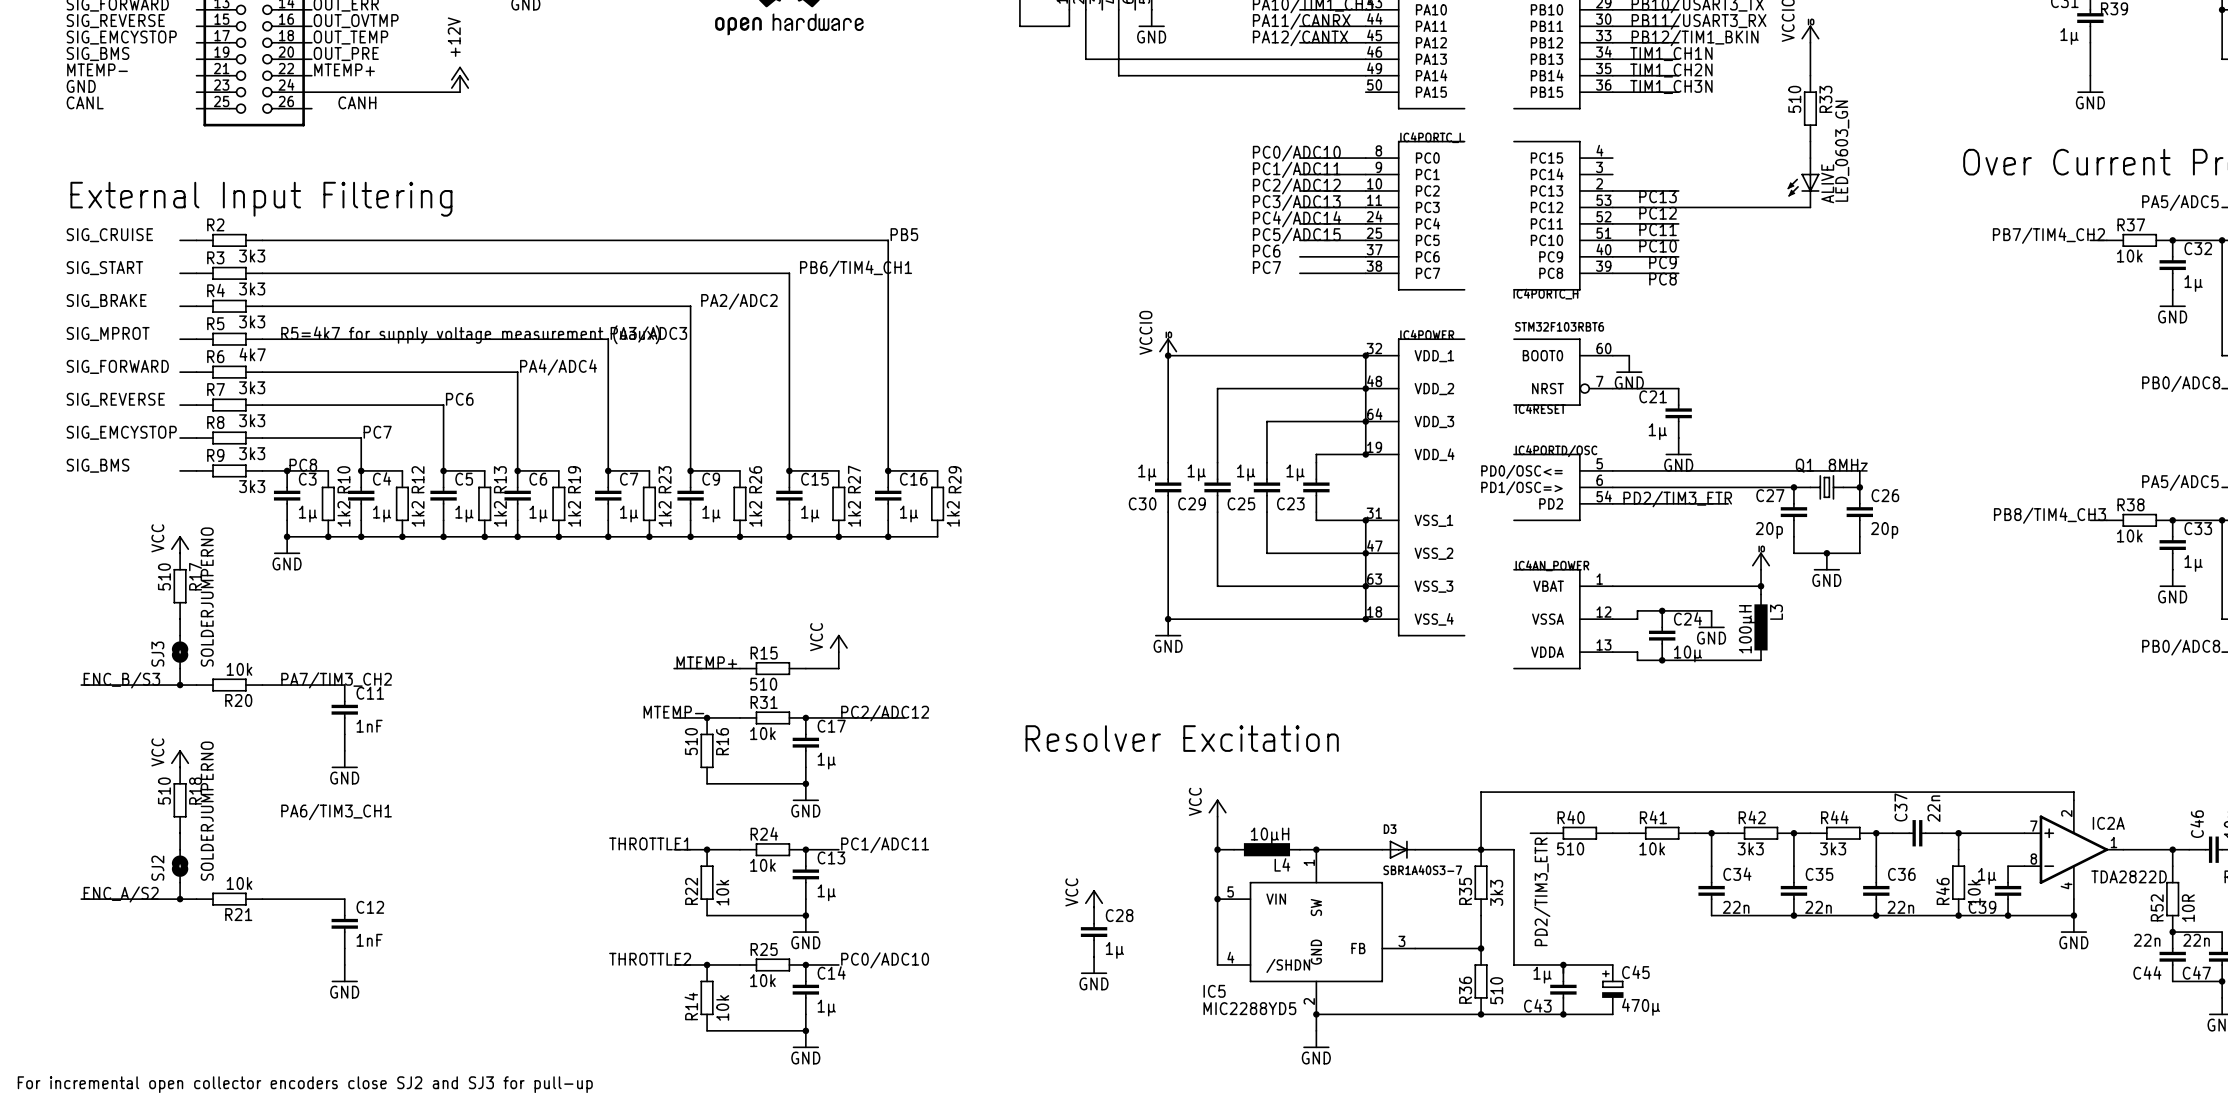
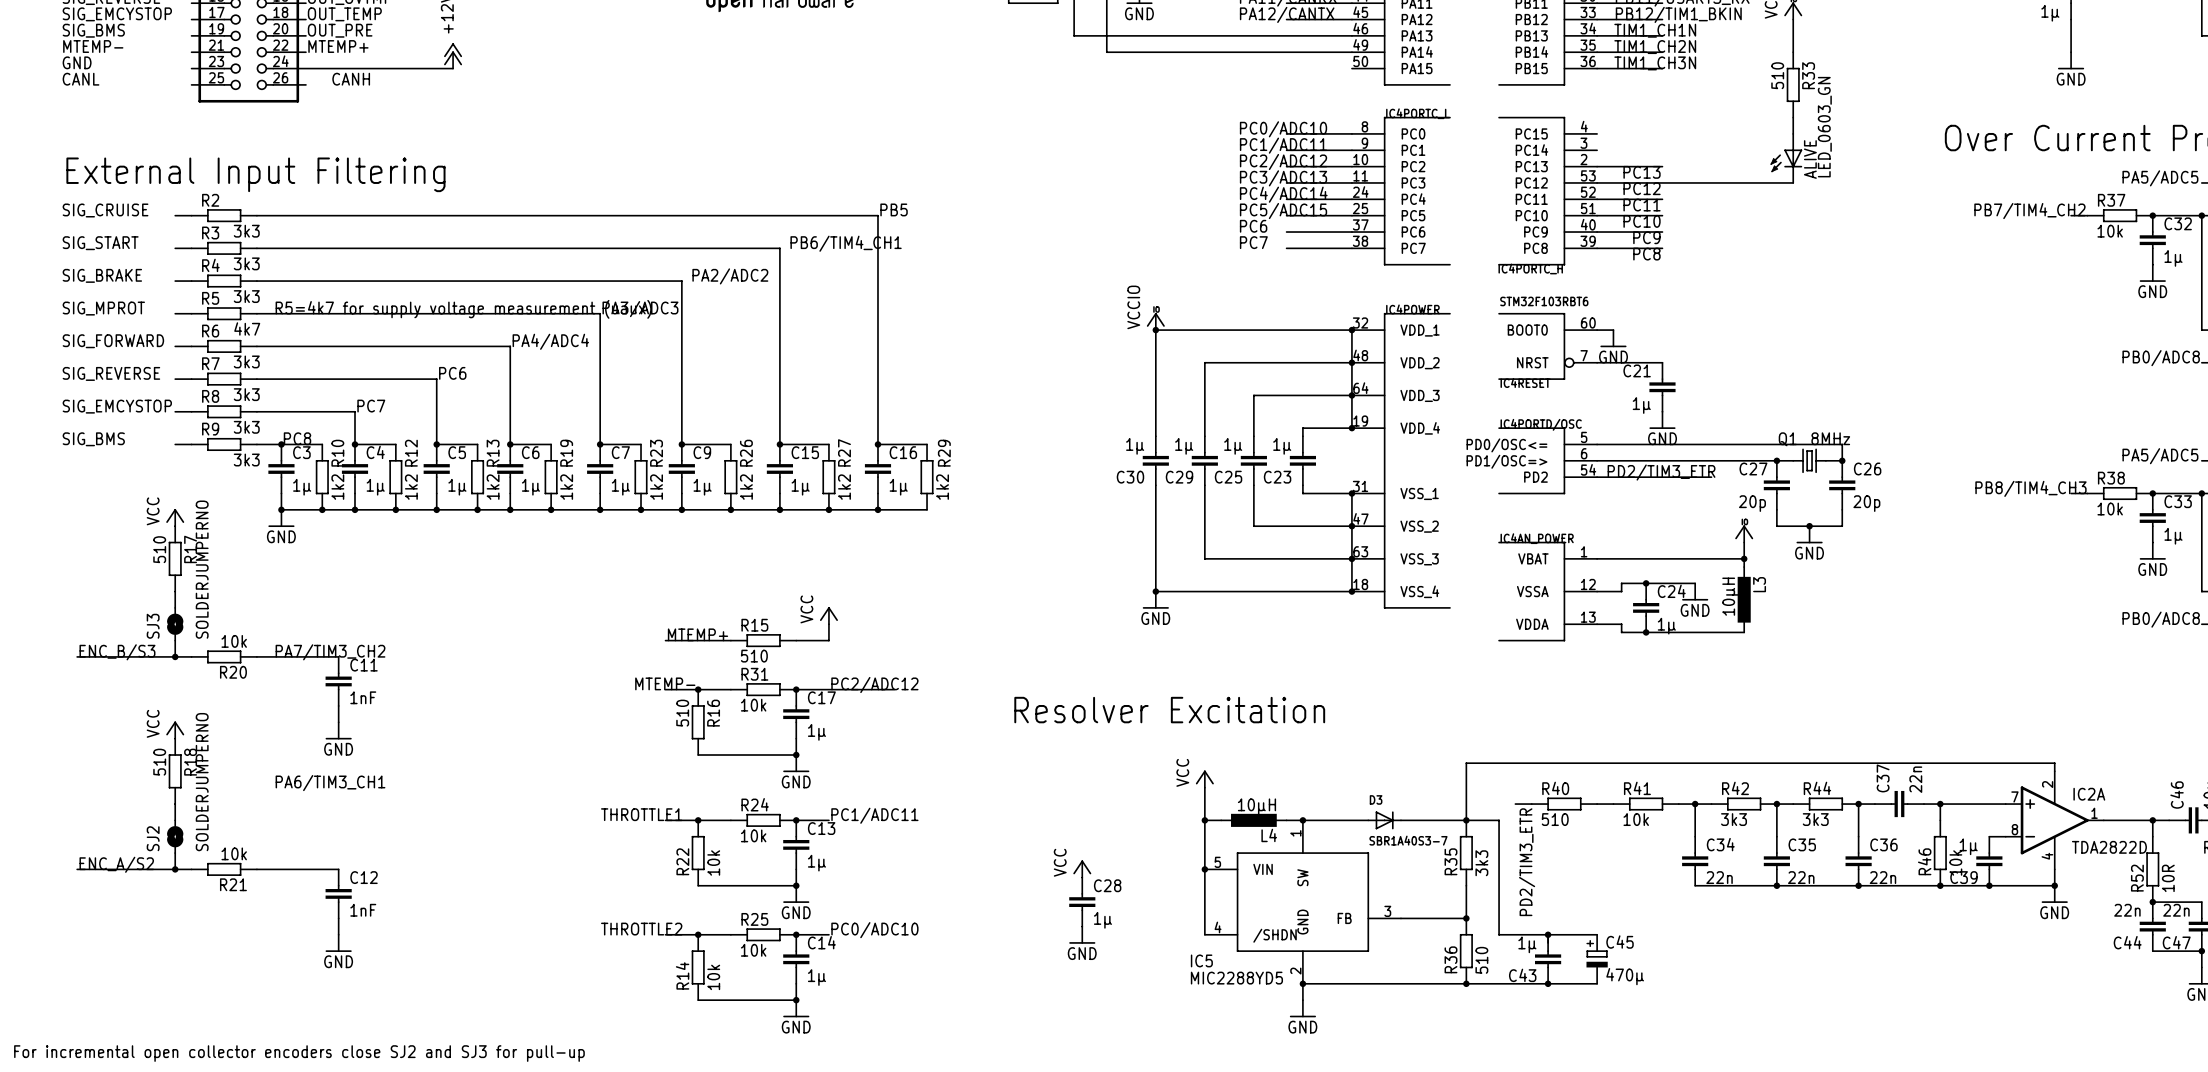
L3 value: 100µH (1747, 629) -> 10µH (1730, 596)
C24 value: 10µ (1688, 654) -> 1µ (1666, 626)

